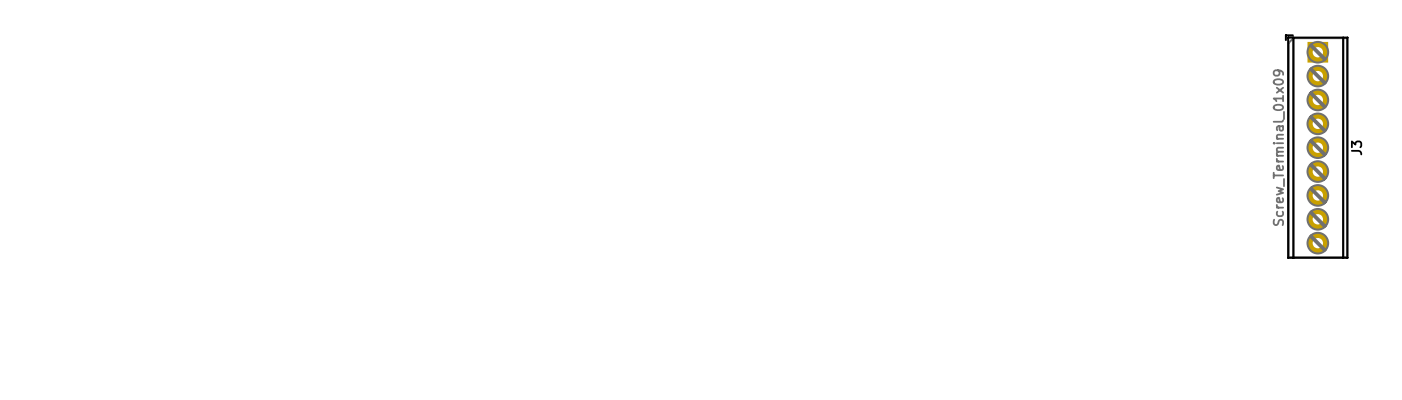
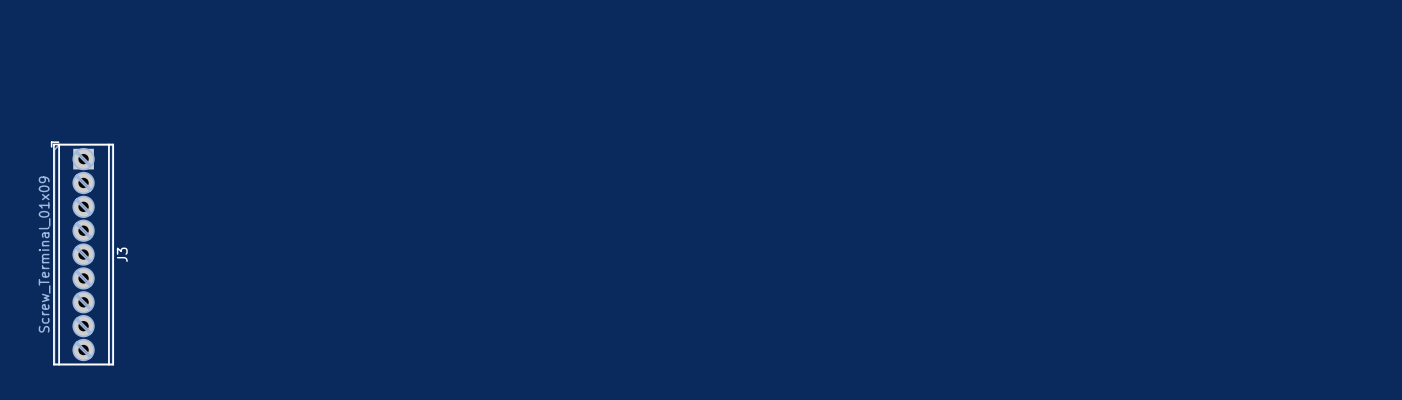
J3 footprint: [1285, 34, 1349, 259] -> [51, 141, 114, 366]

